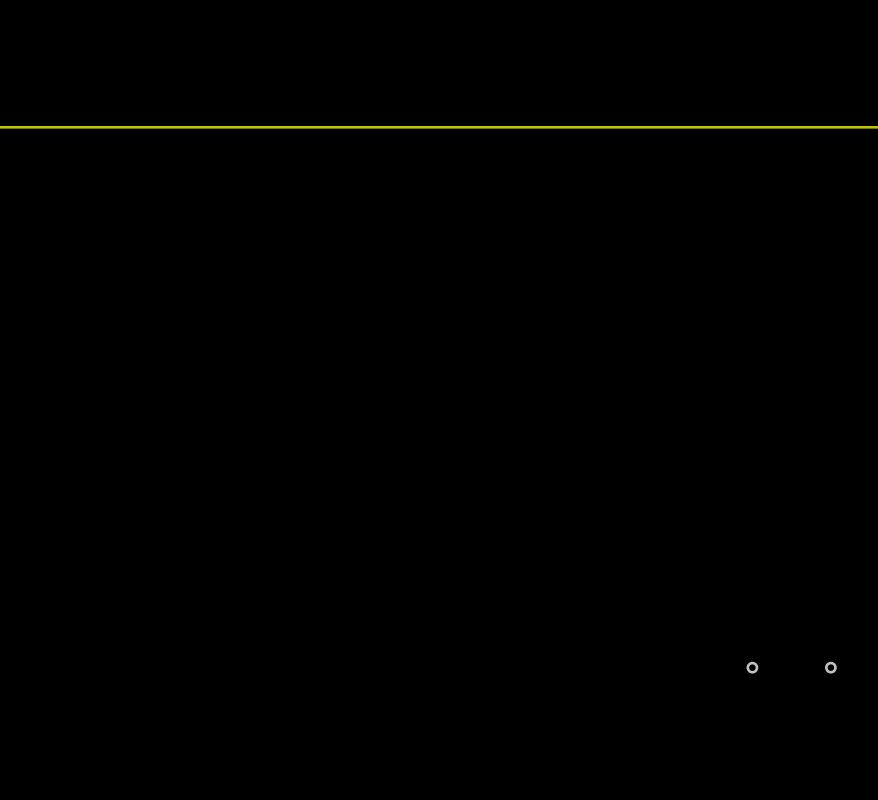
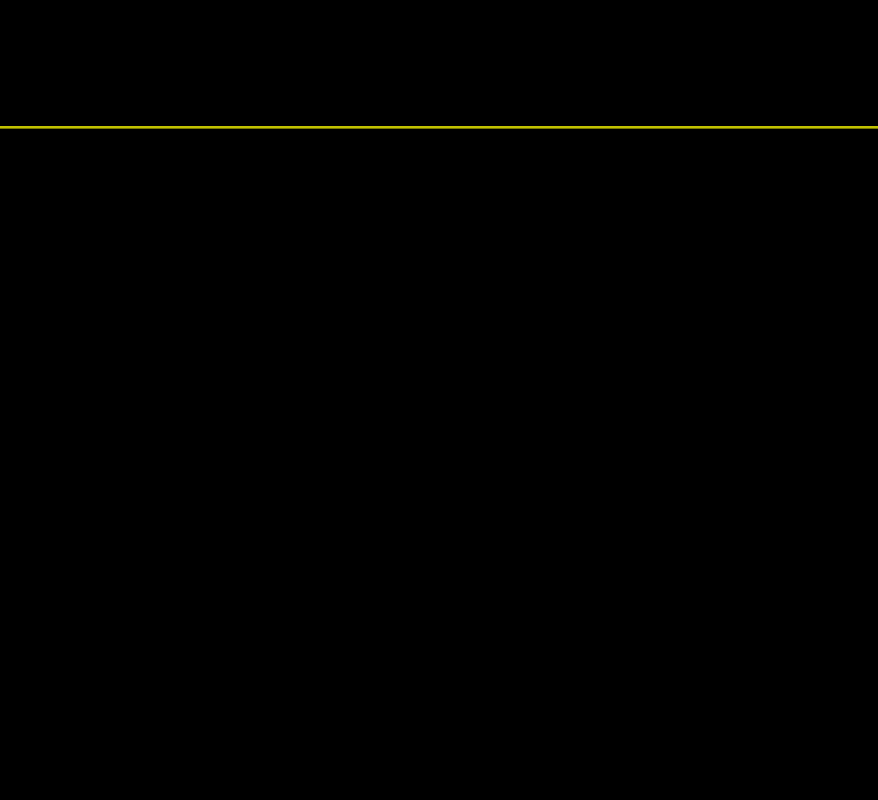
via: (752, 667) -> none
via: (830, 667) -> none

